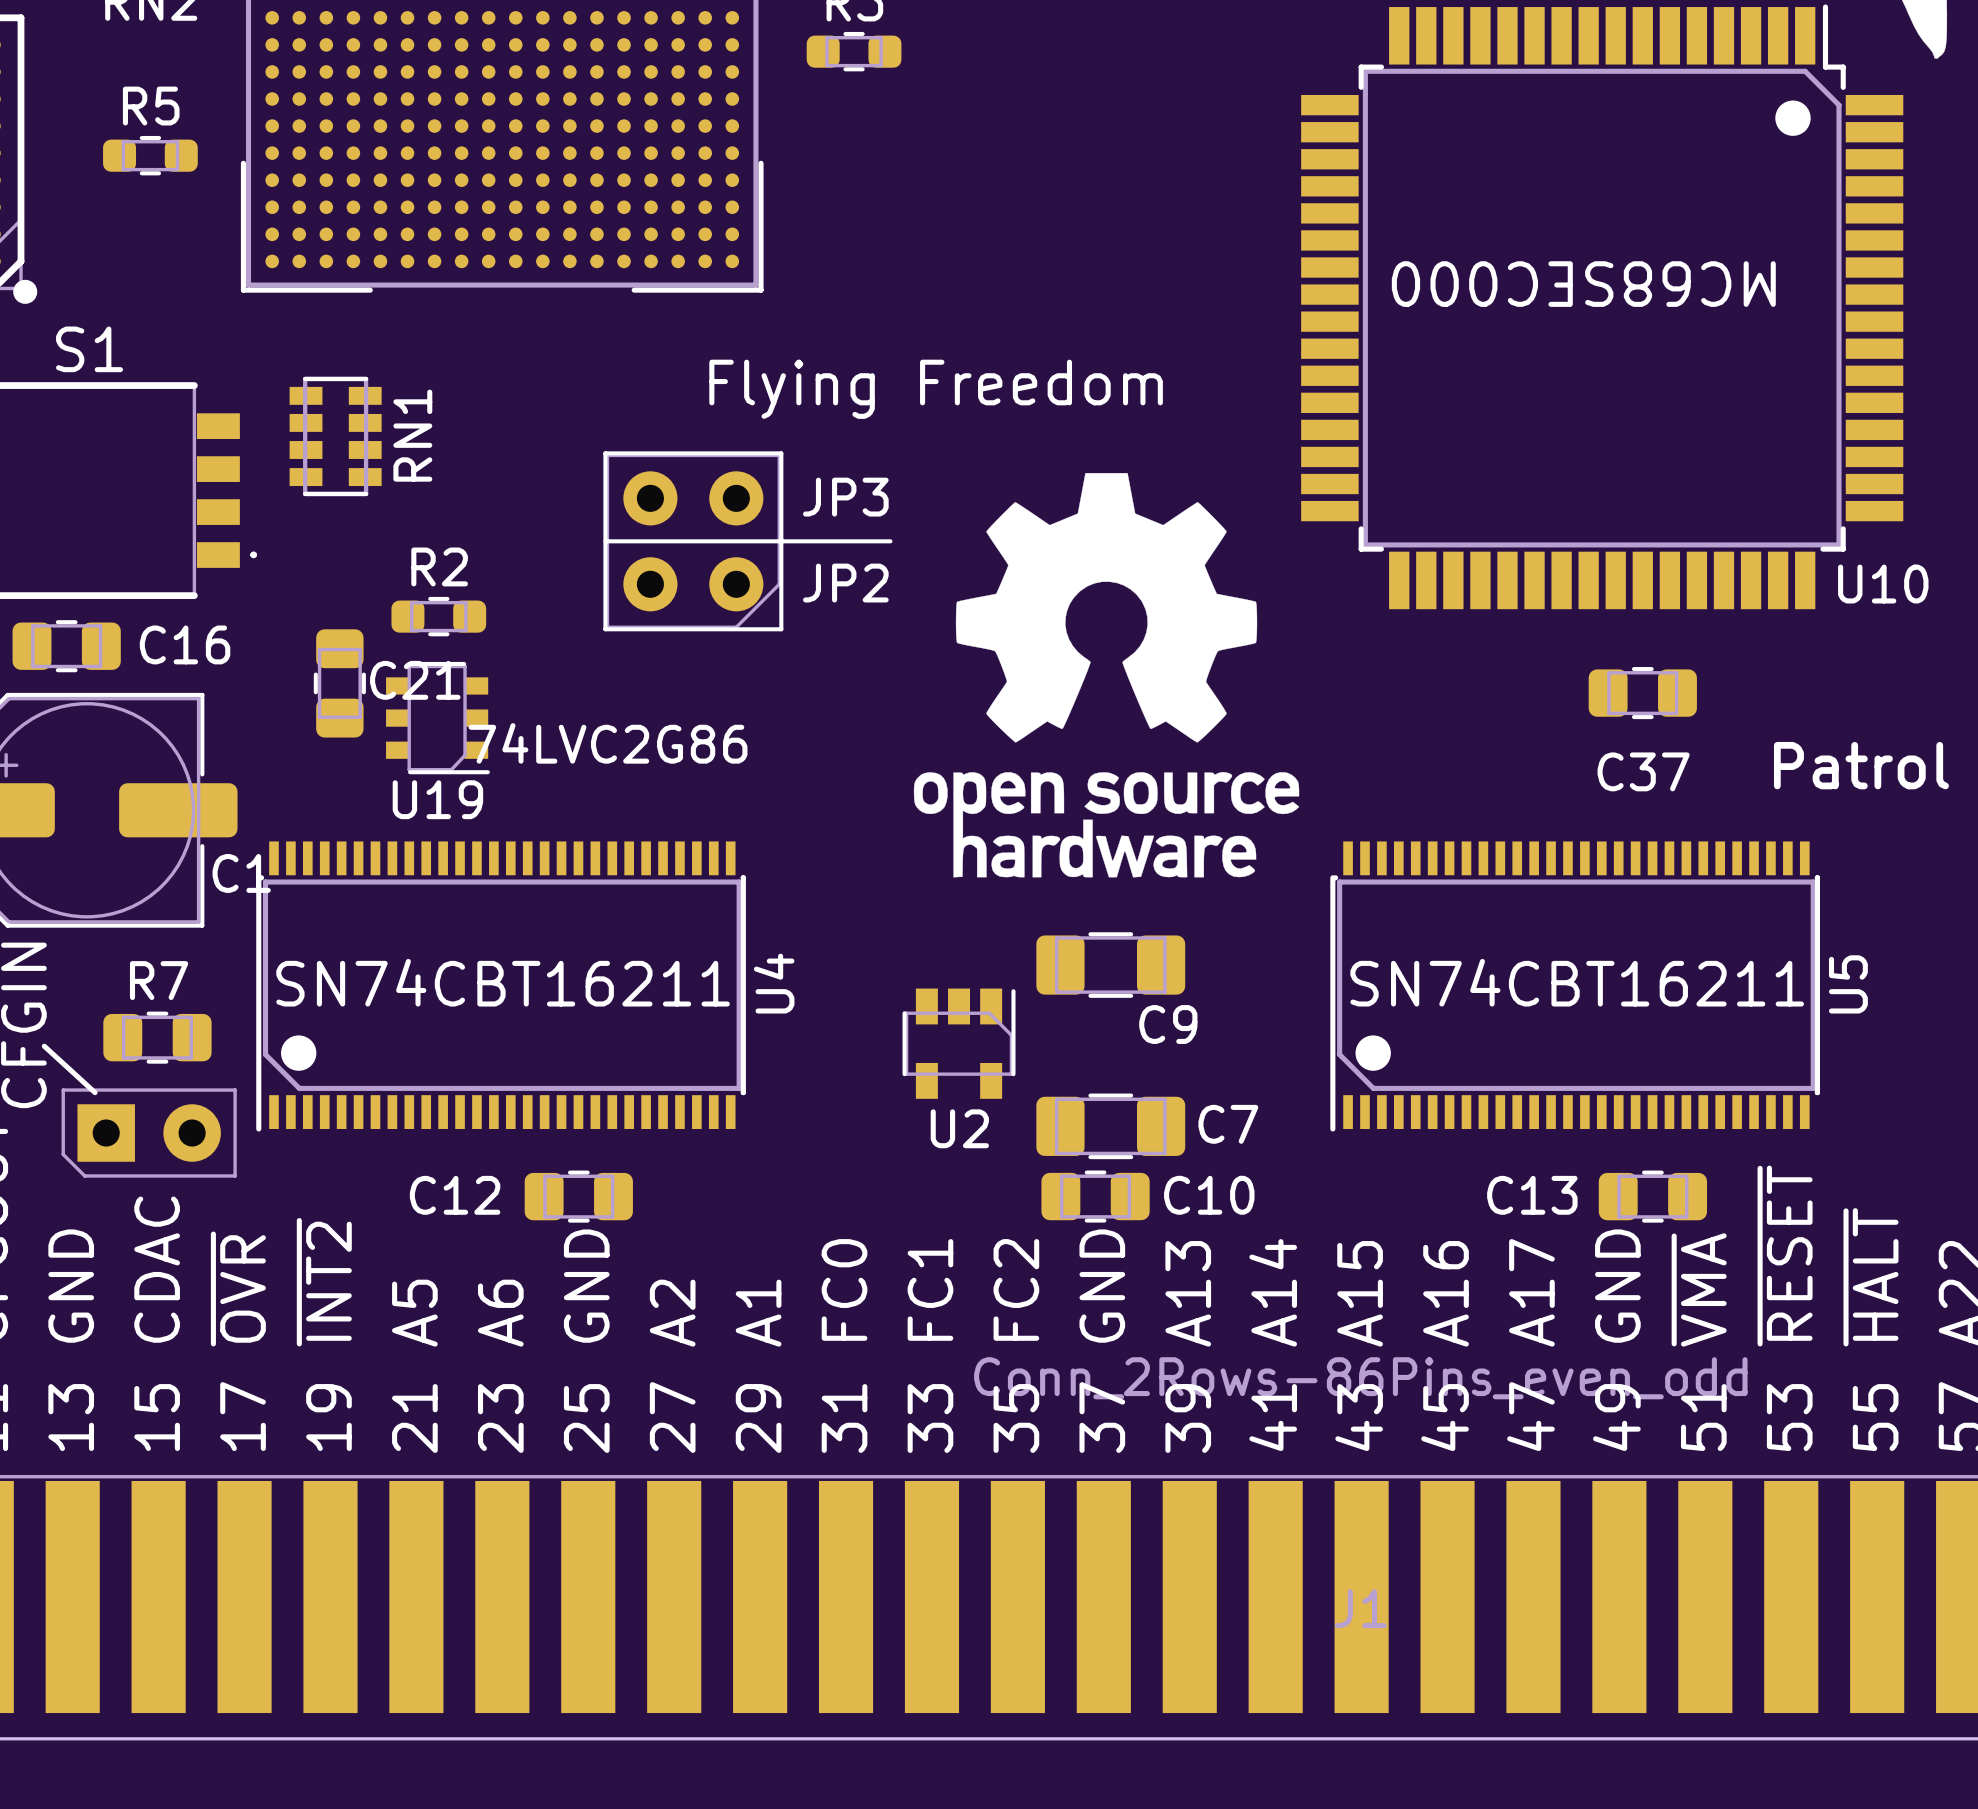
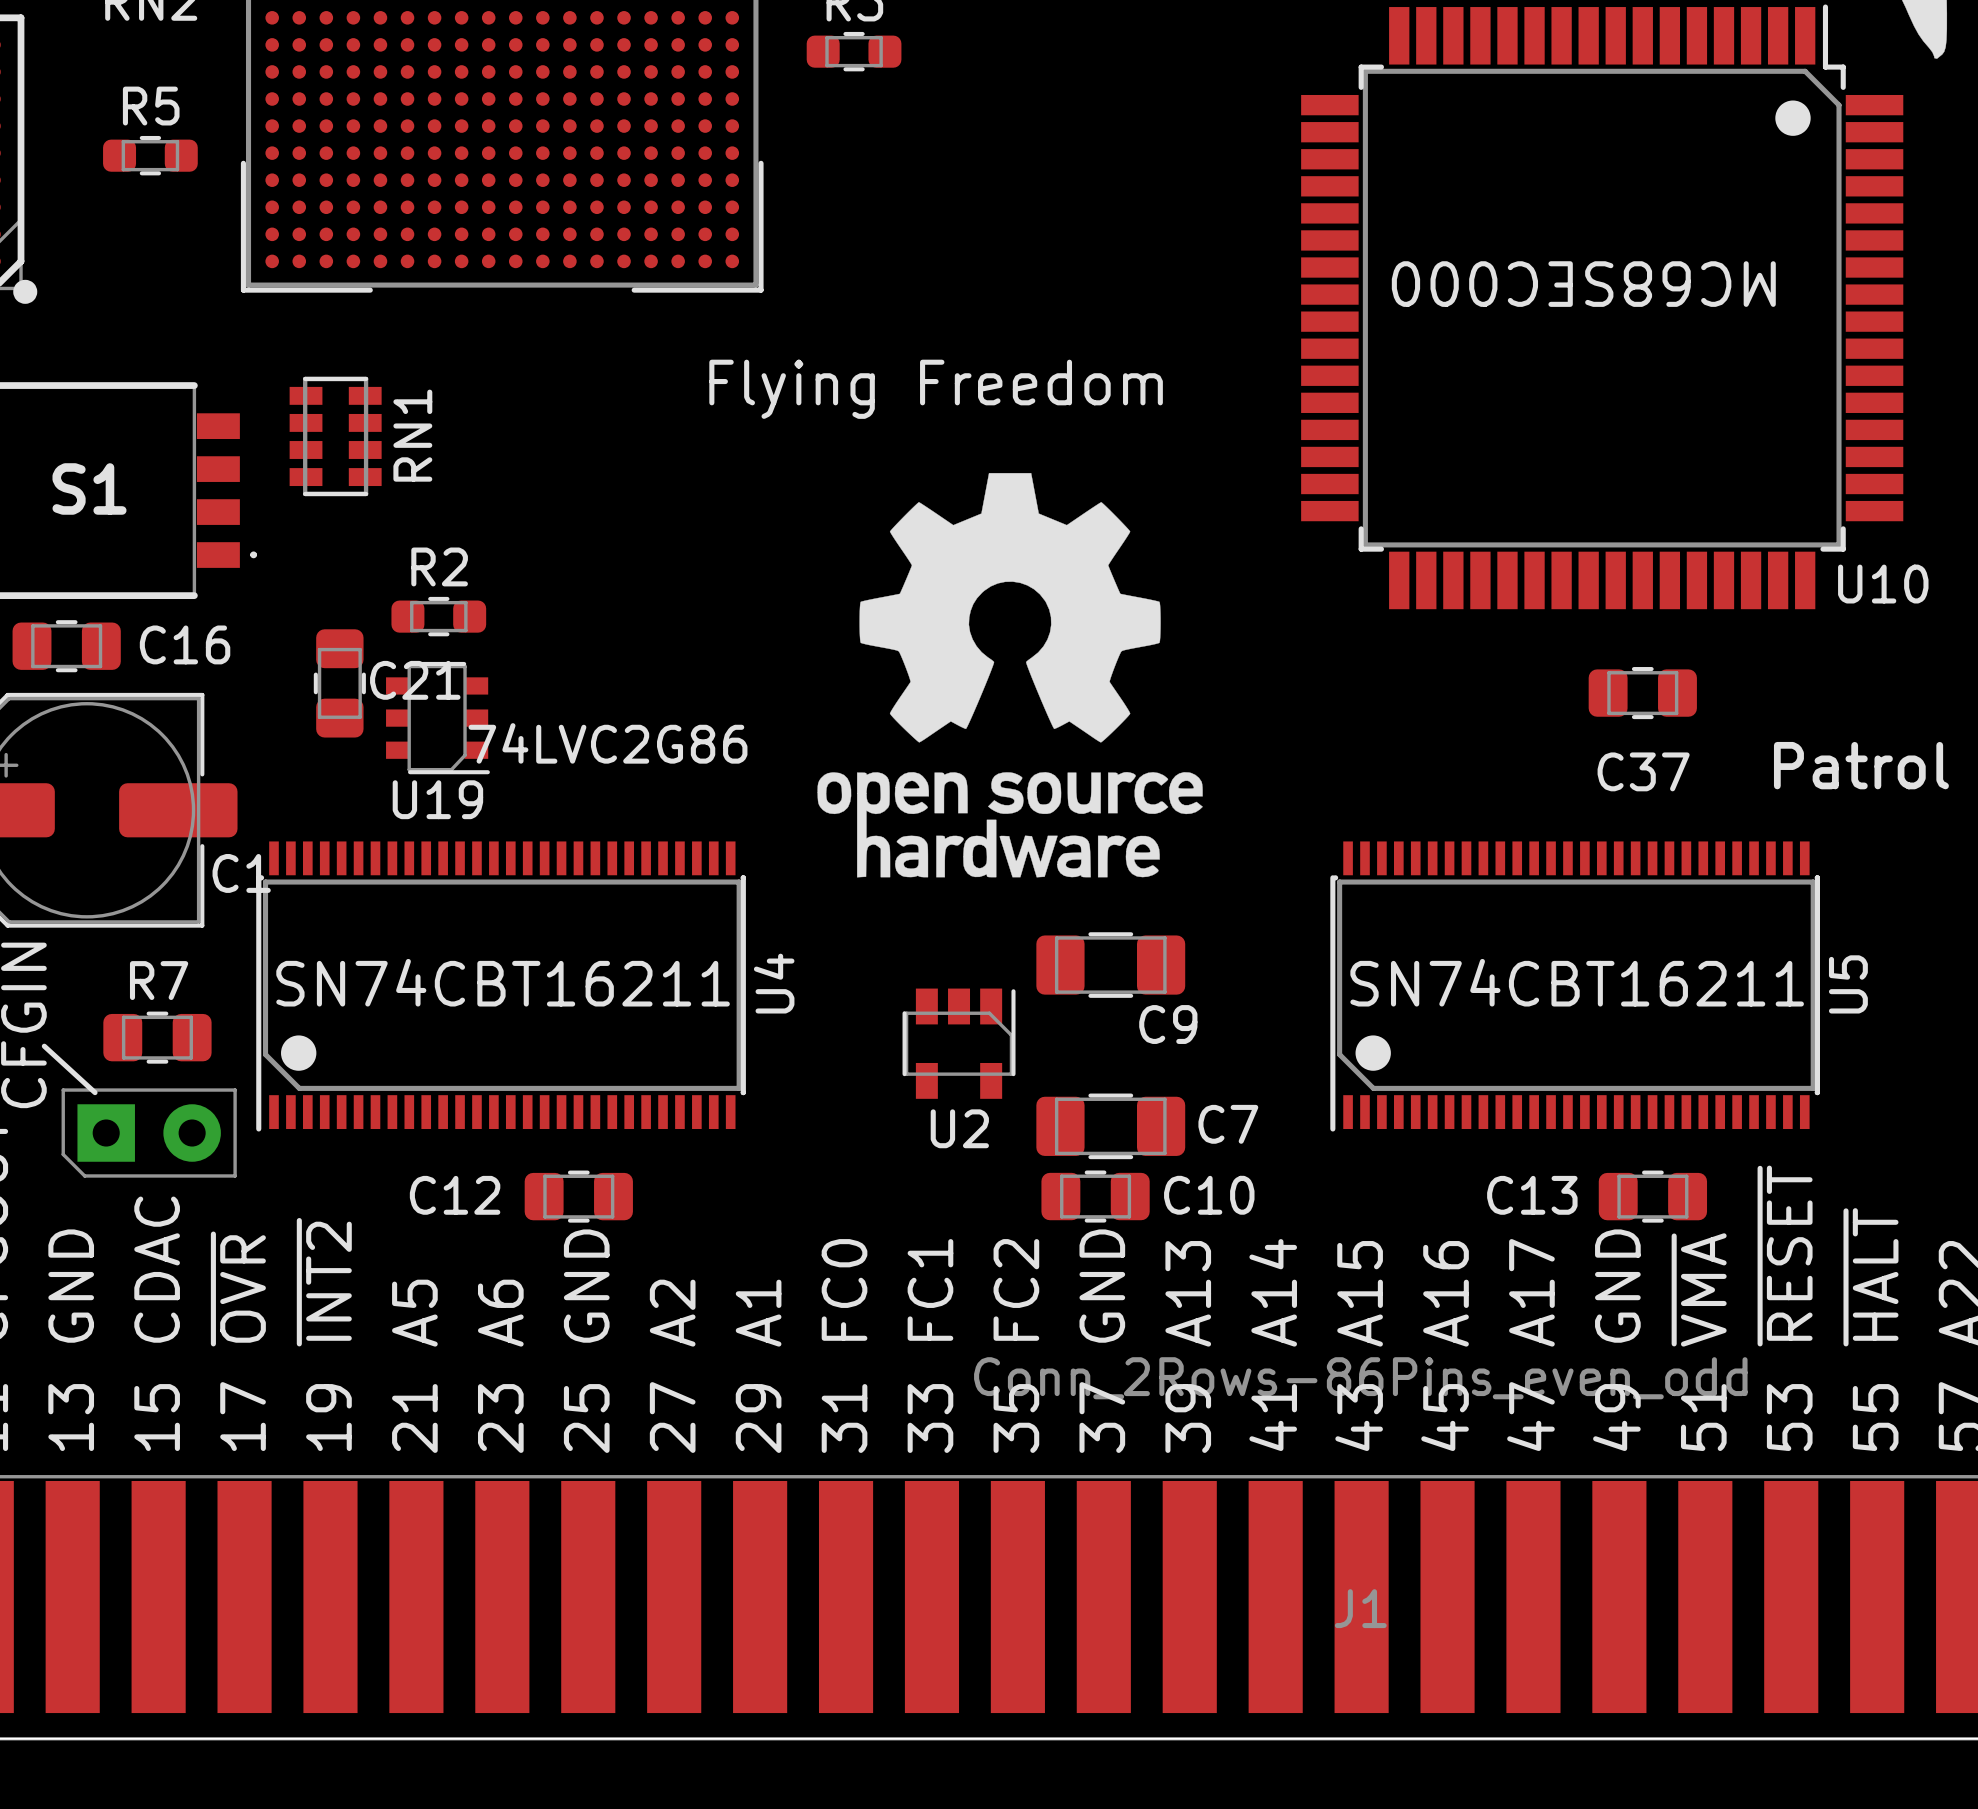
S1 name position: S1 (89, 349) -> S1 (89, 488)
text: JP3 (845, 497) -> none
part: (693, 541) -> none
line: (781, 541) (890, 541) -> none
text: JP2 (845, 583) -> none
drawing position: (1106, 675) -> (1010, 675)

